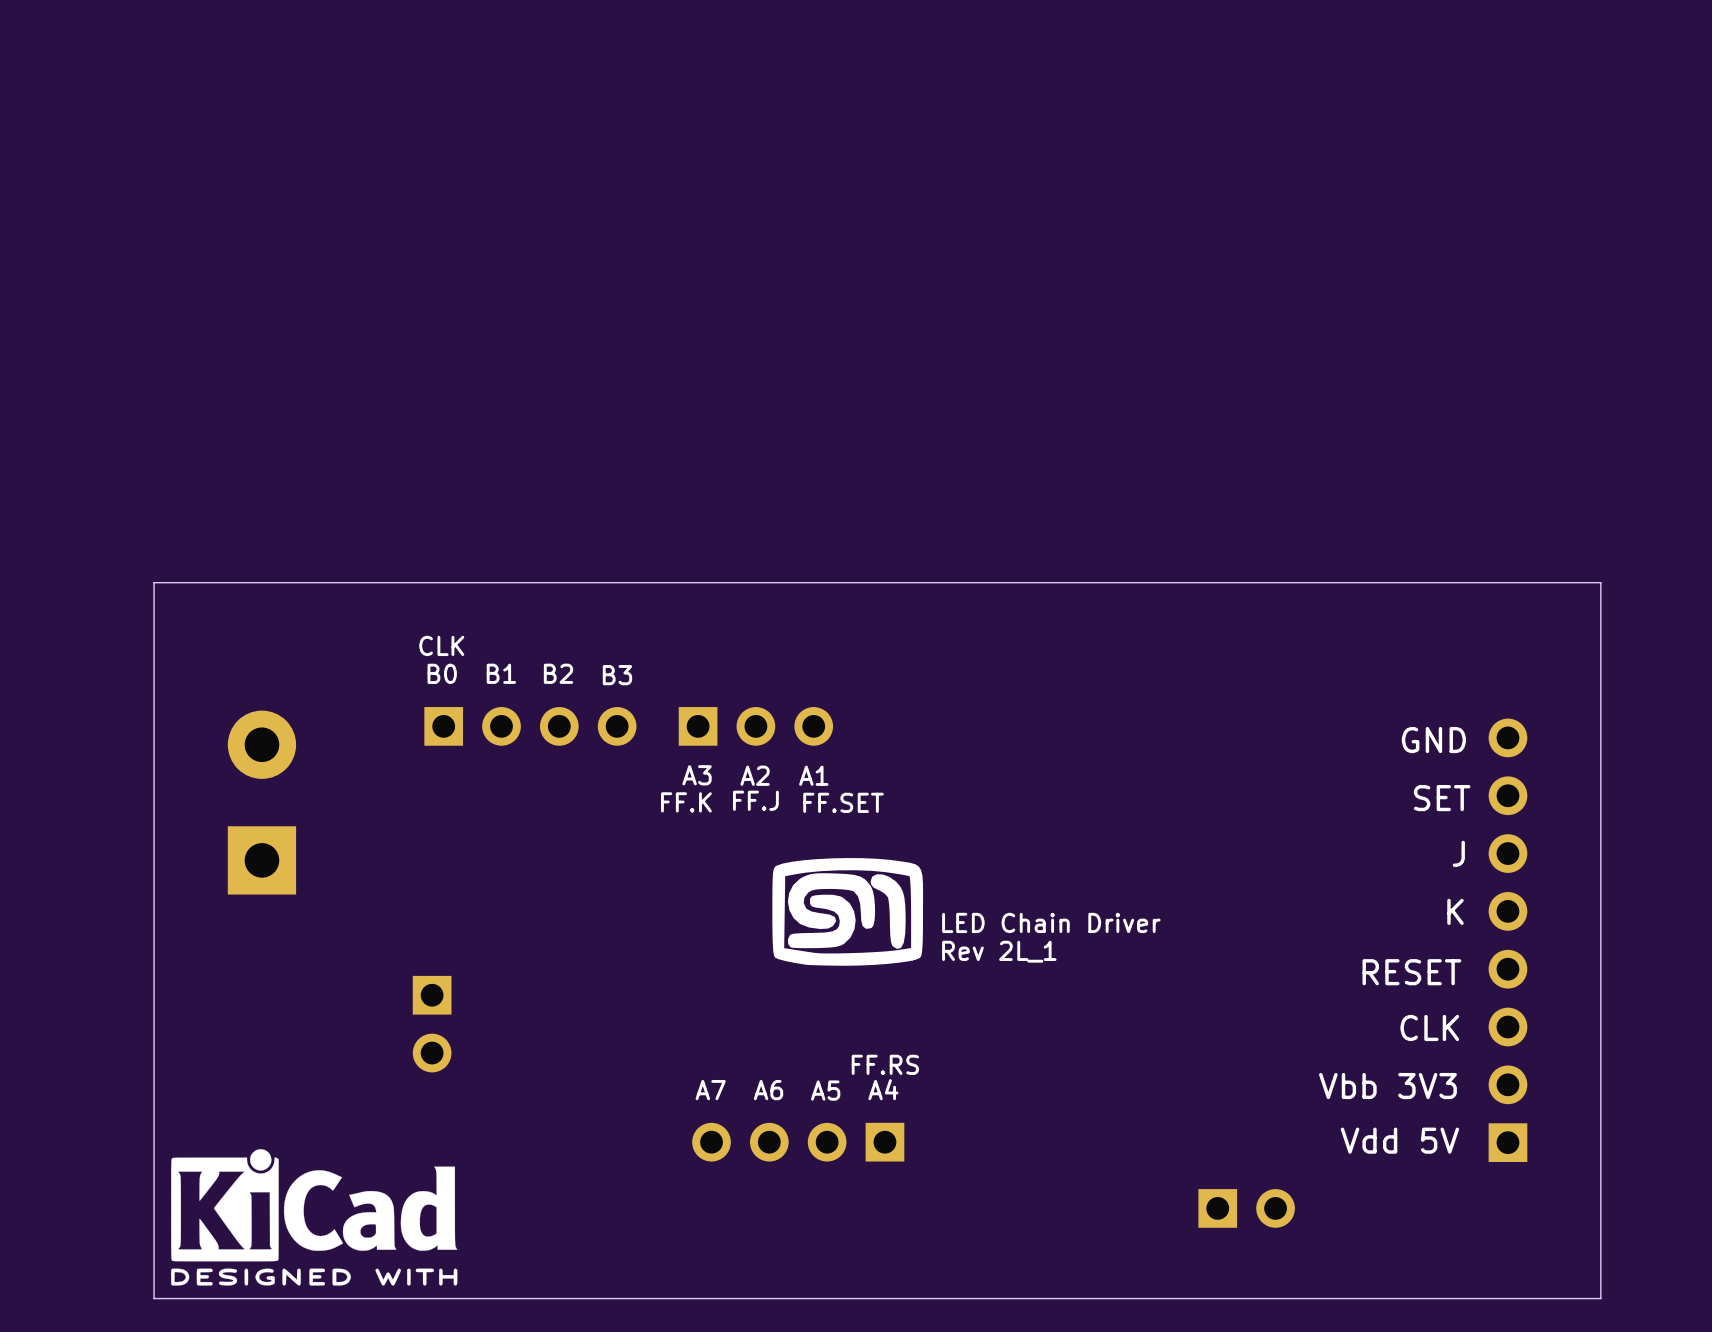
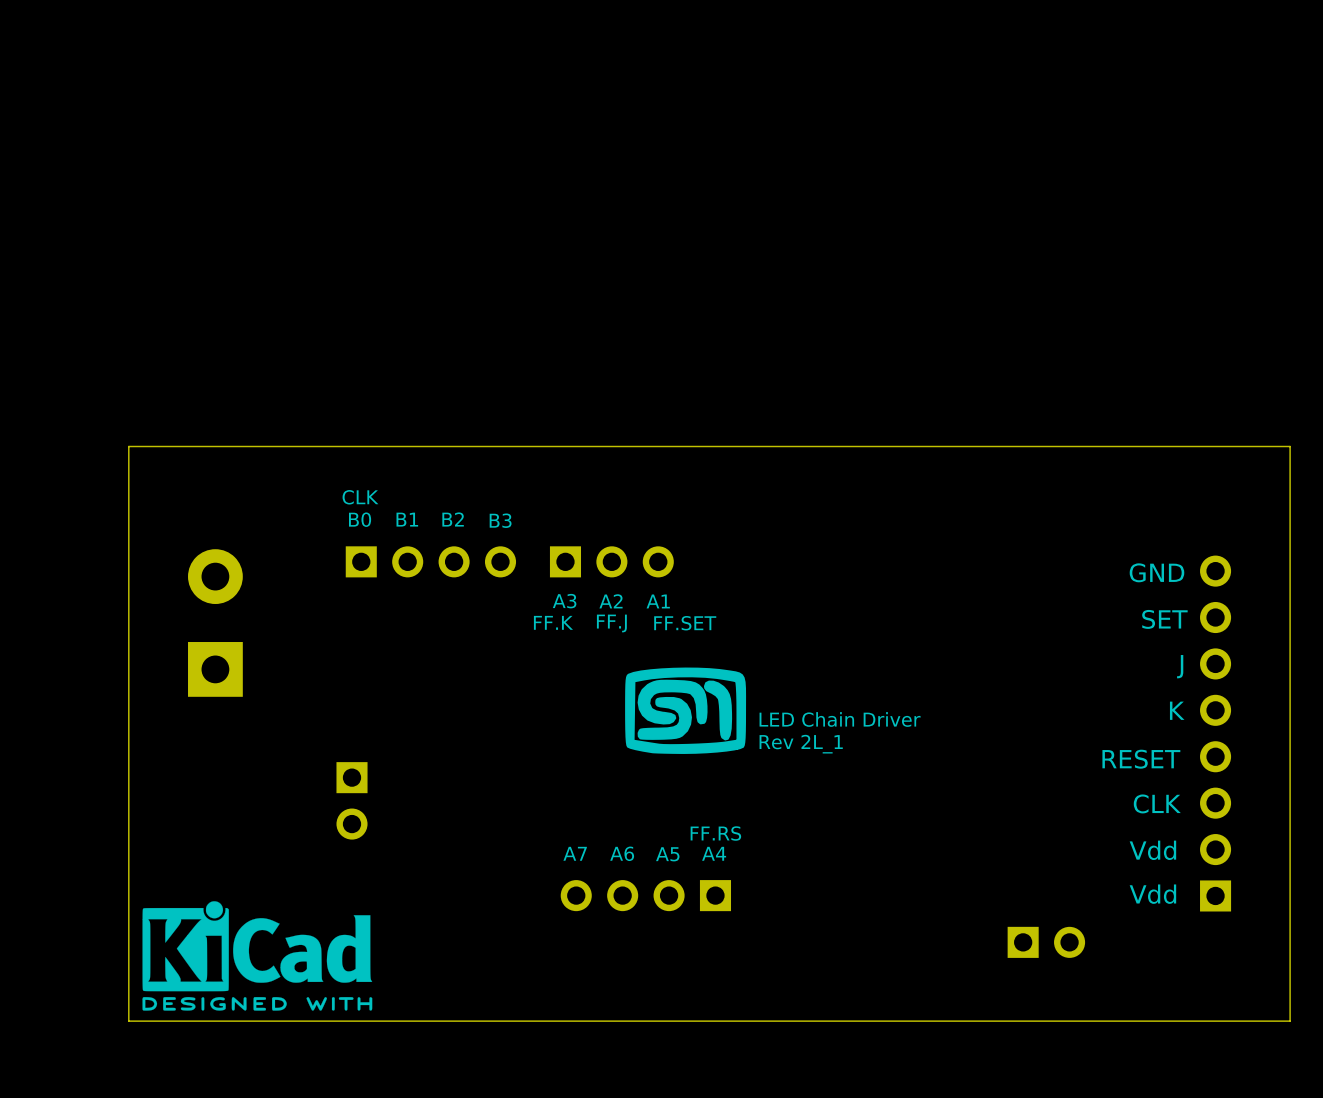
text: Vbb 3V3 (1387, 1086) -> Vdd (1152, 850)
text: Vdd 5V (1399, 1140) -> Vdd (1152, 894)
part position: (1246, 1208) -> (1046, 942)

